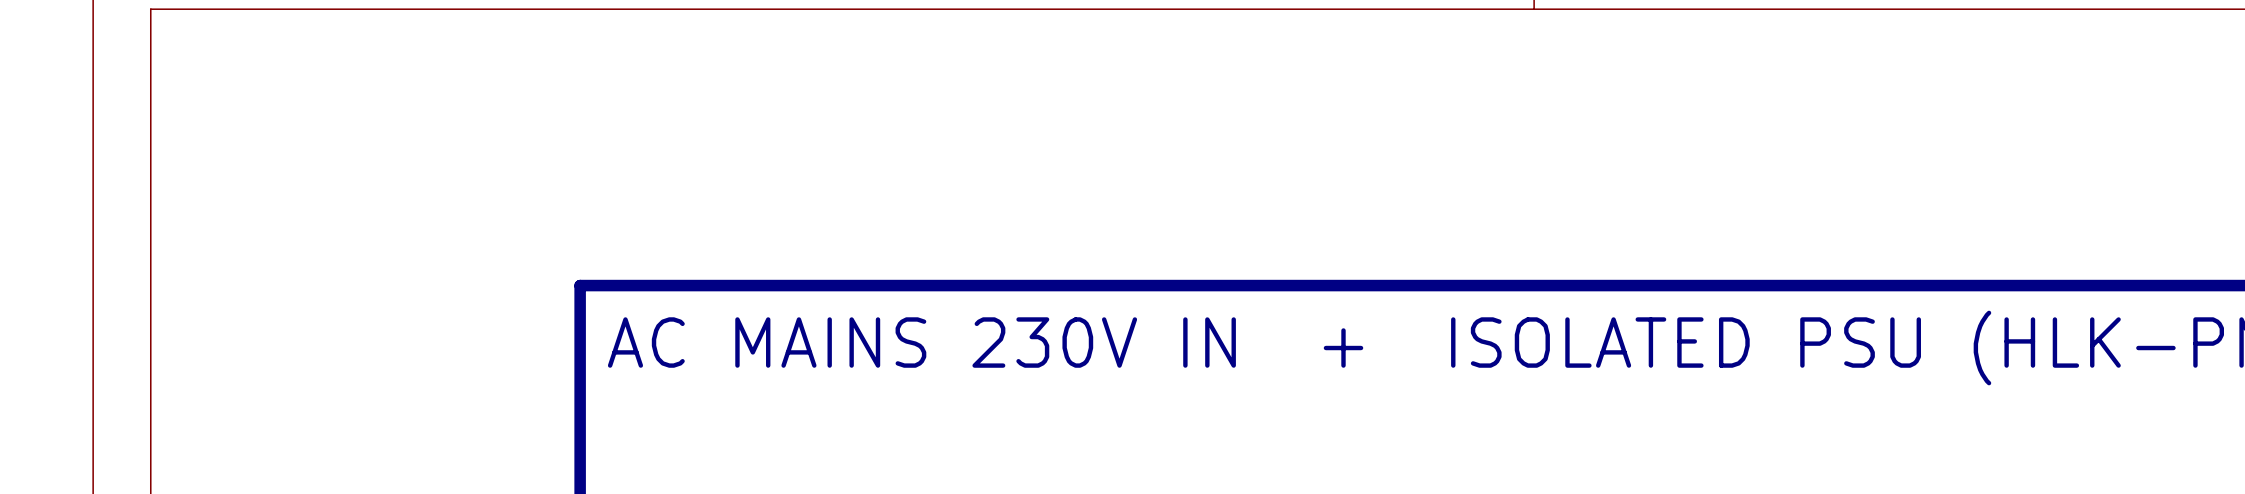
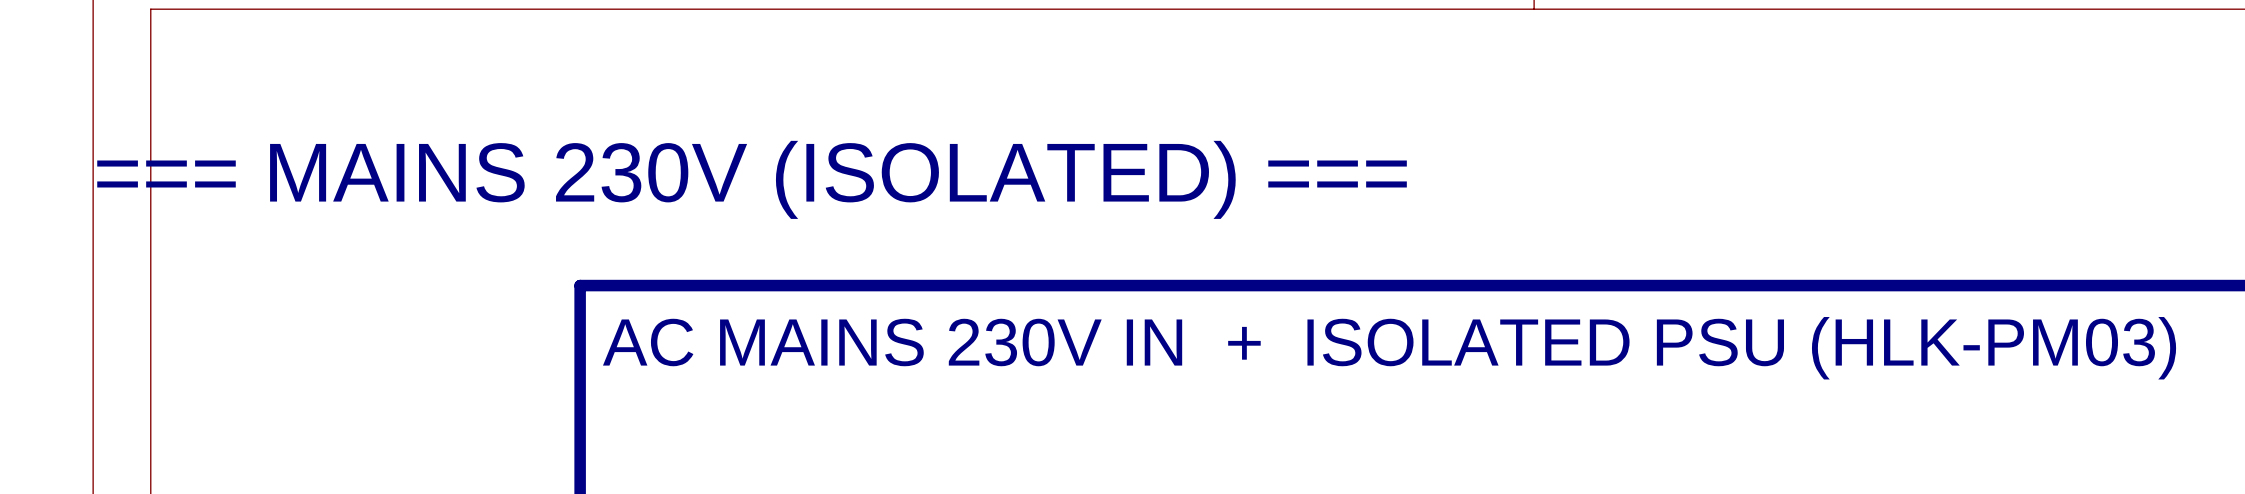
text: none -> === MAINS 230V (ISOLATED) === (752, 179)

